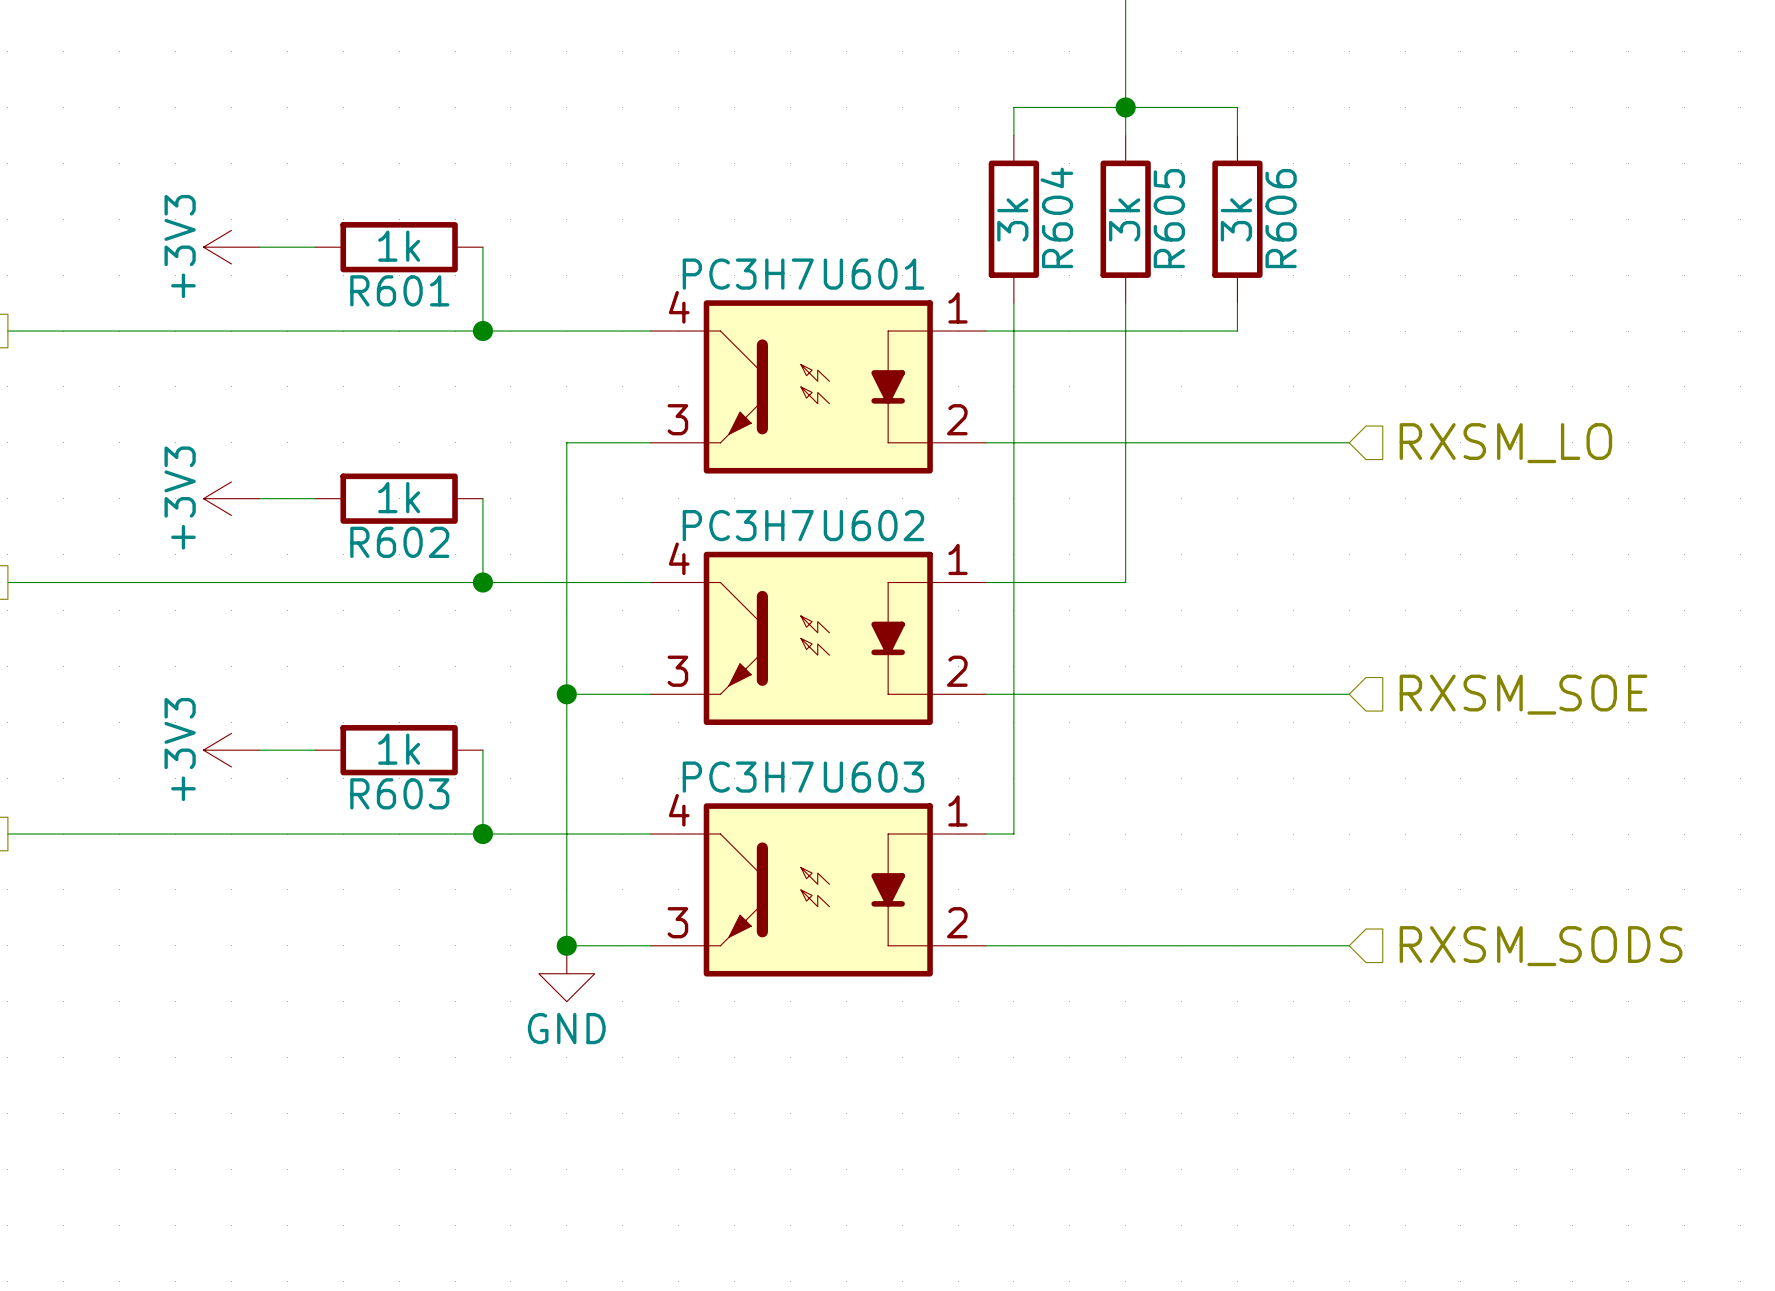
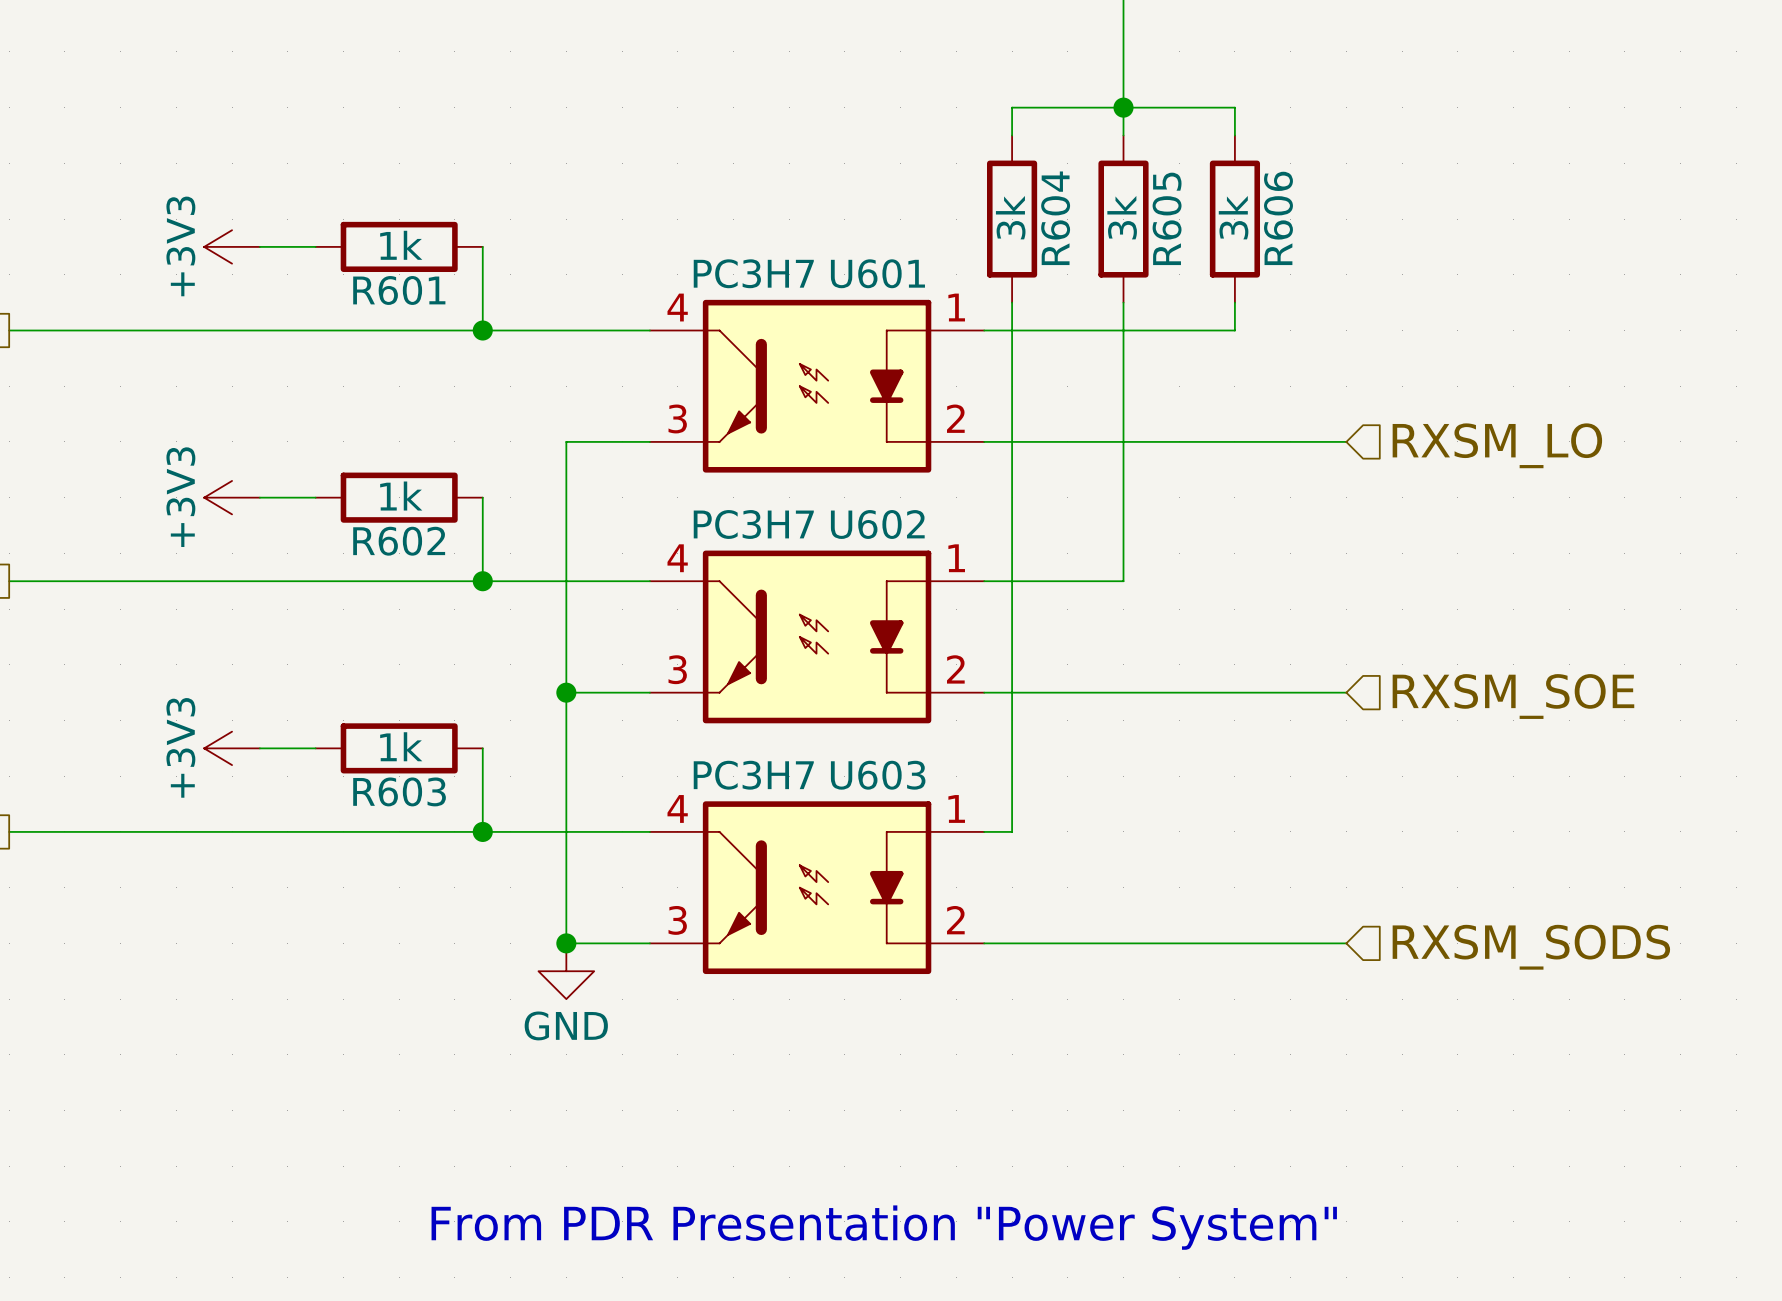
text: none -> From PDR Presentation "Power System" (884, 1227)

